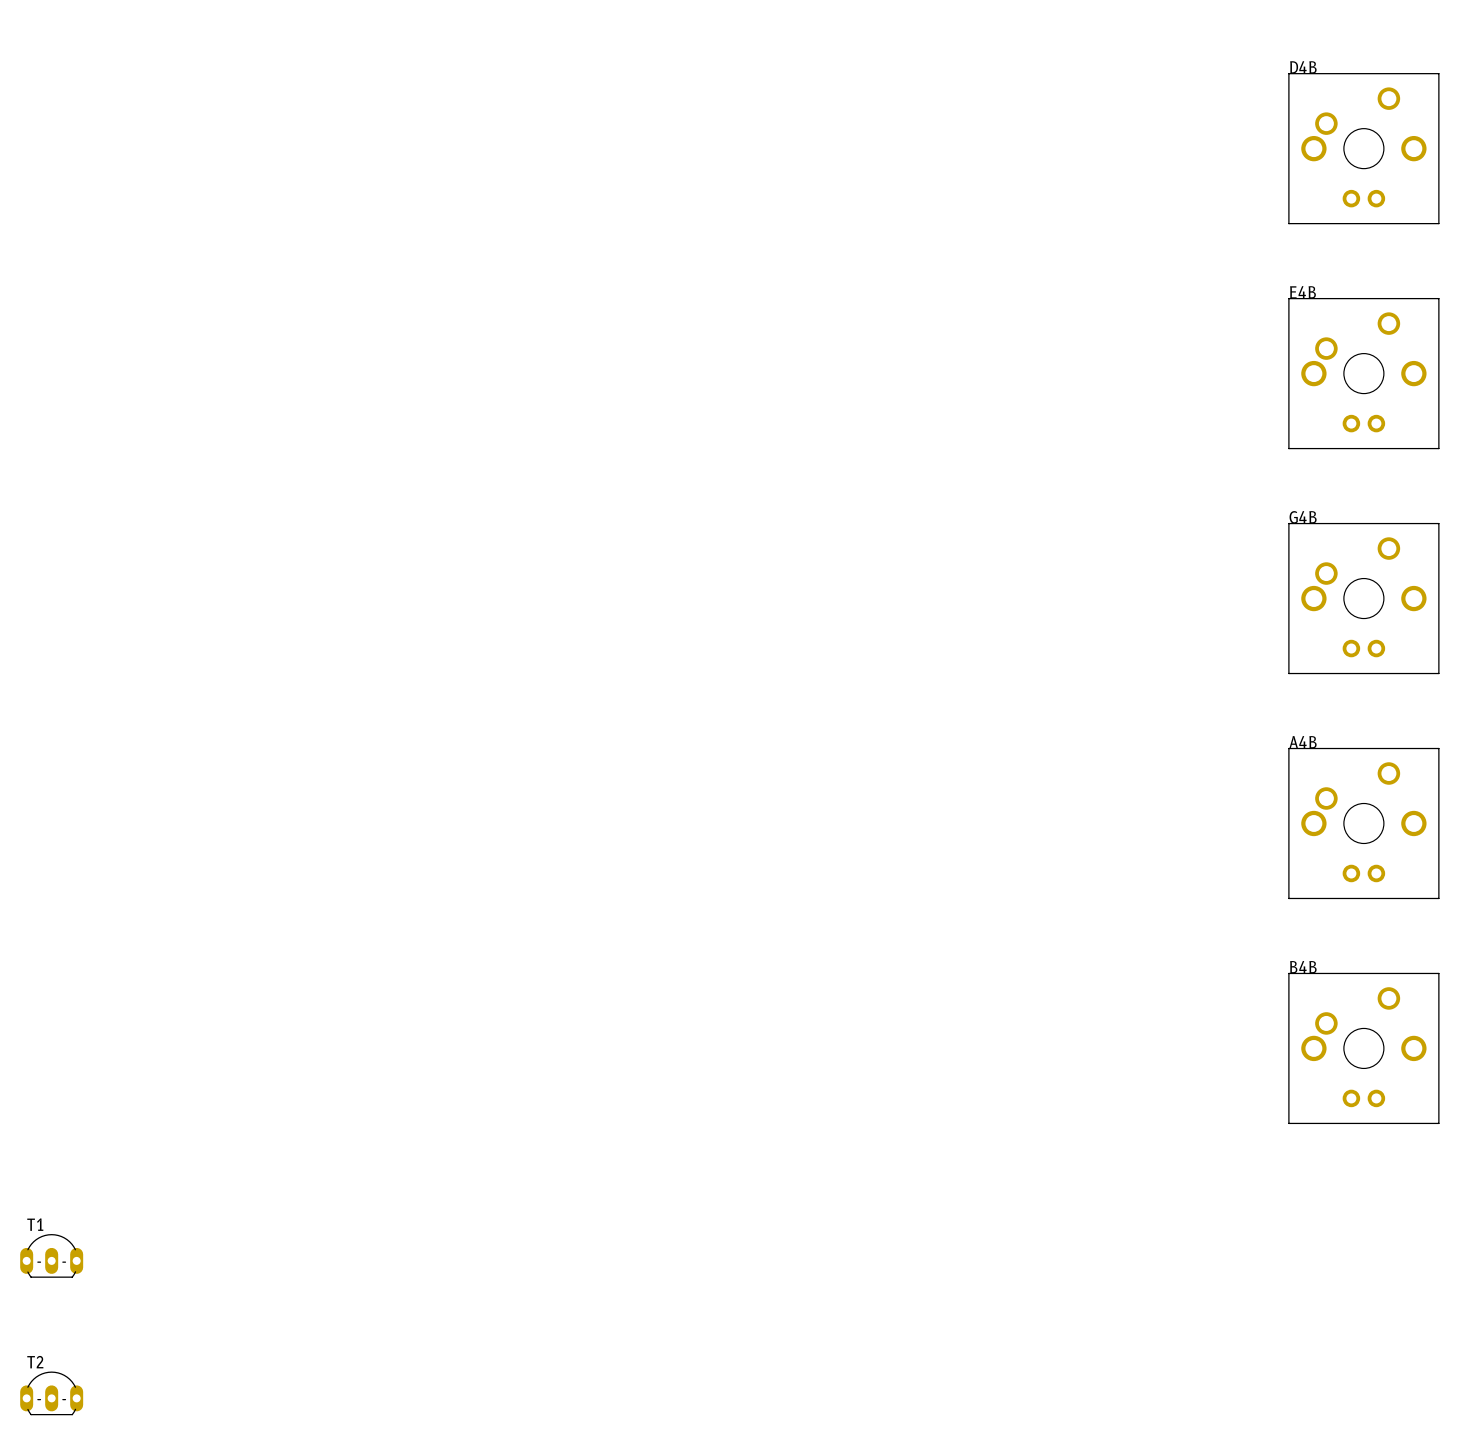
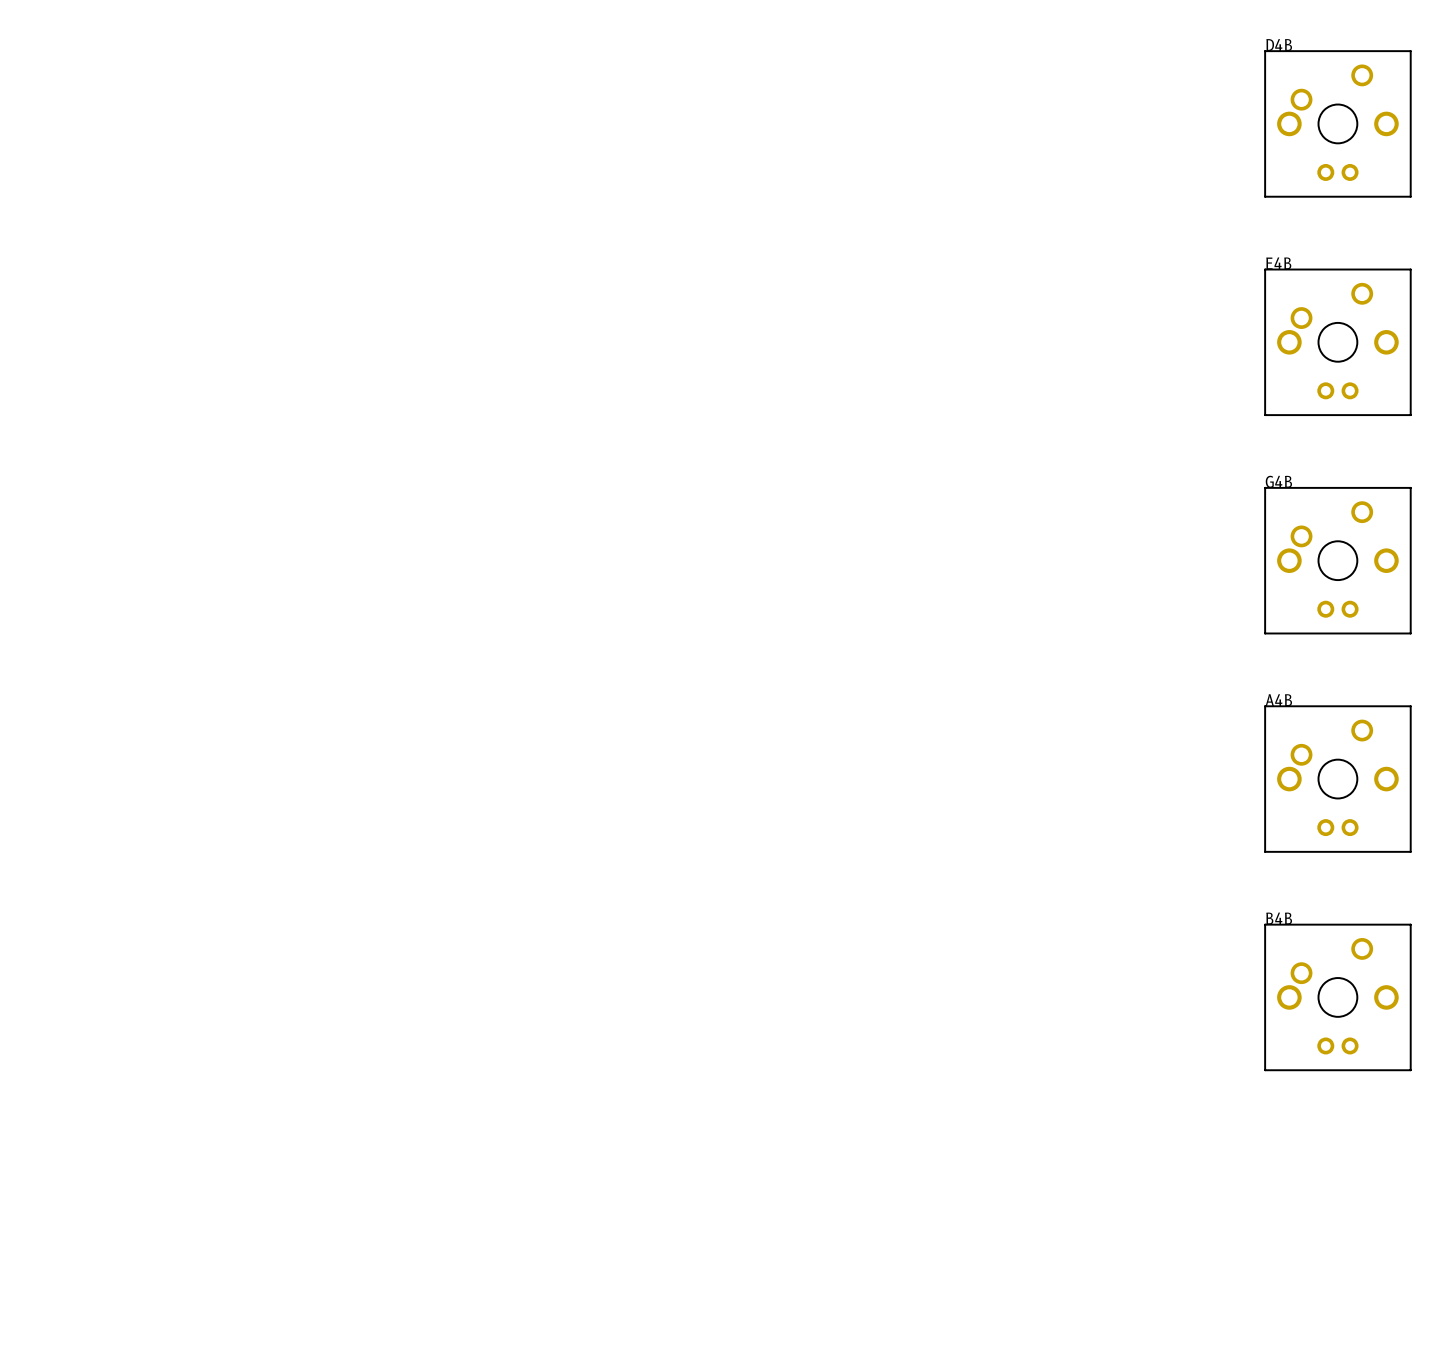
T1: (51, 1255) -> none
T2: (51, 1393) -> none

